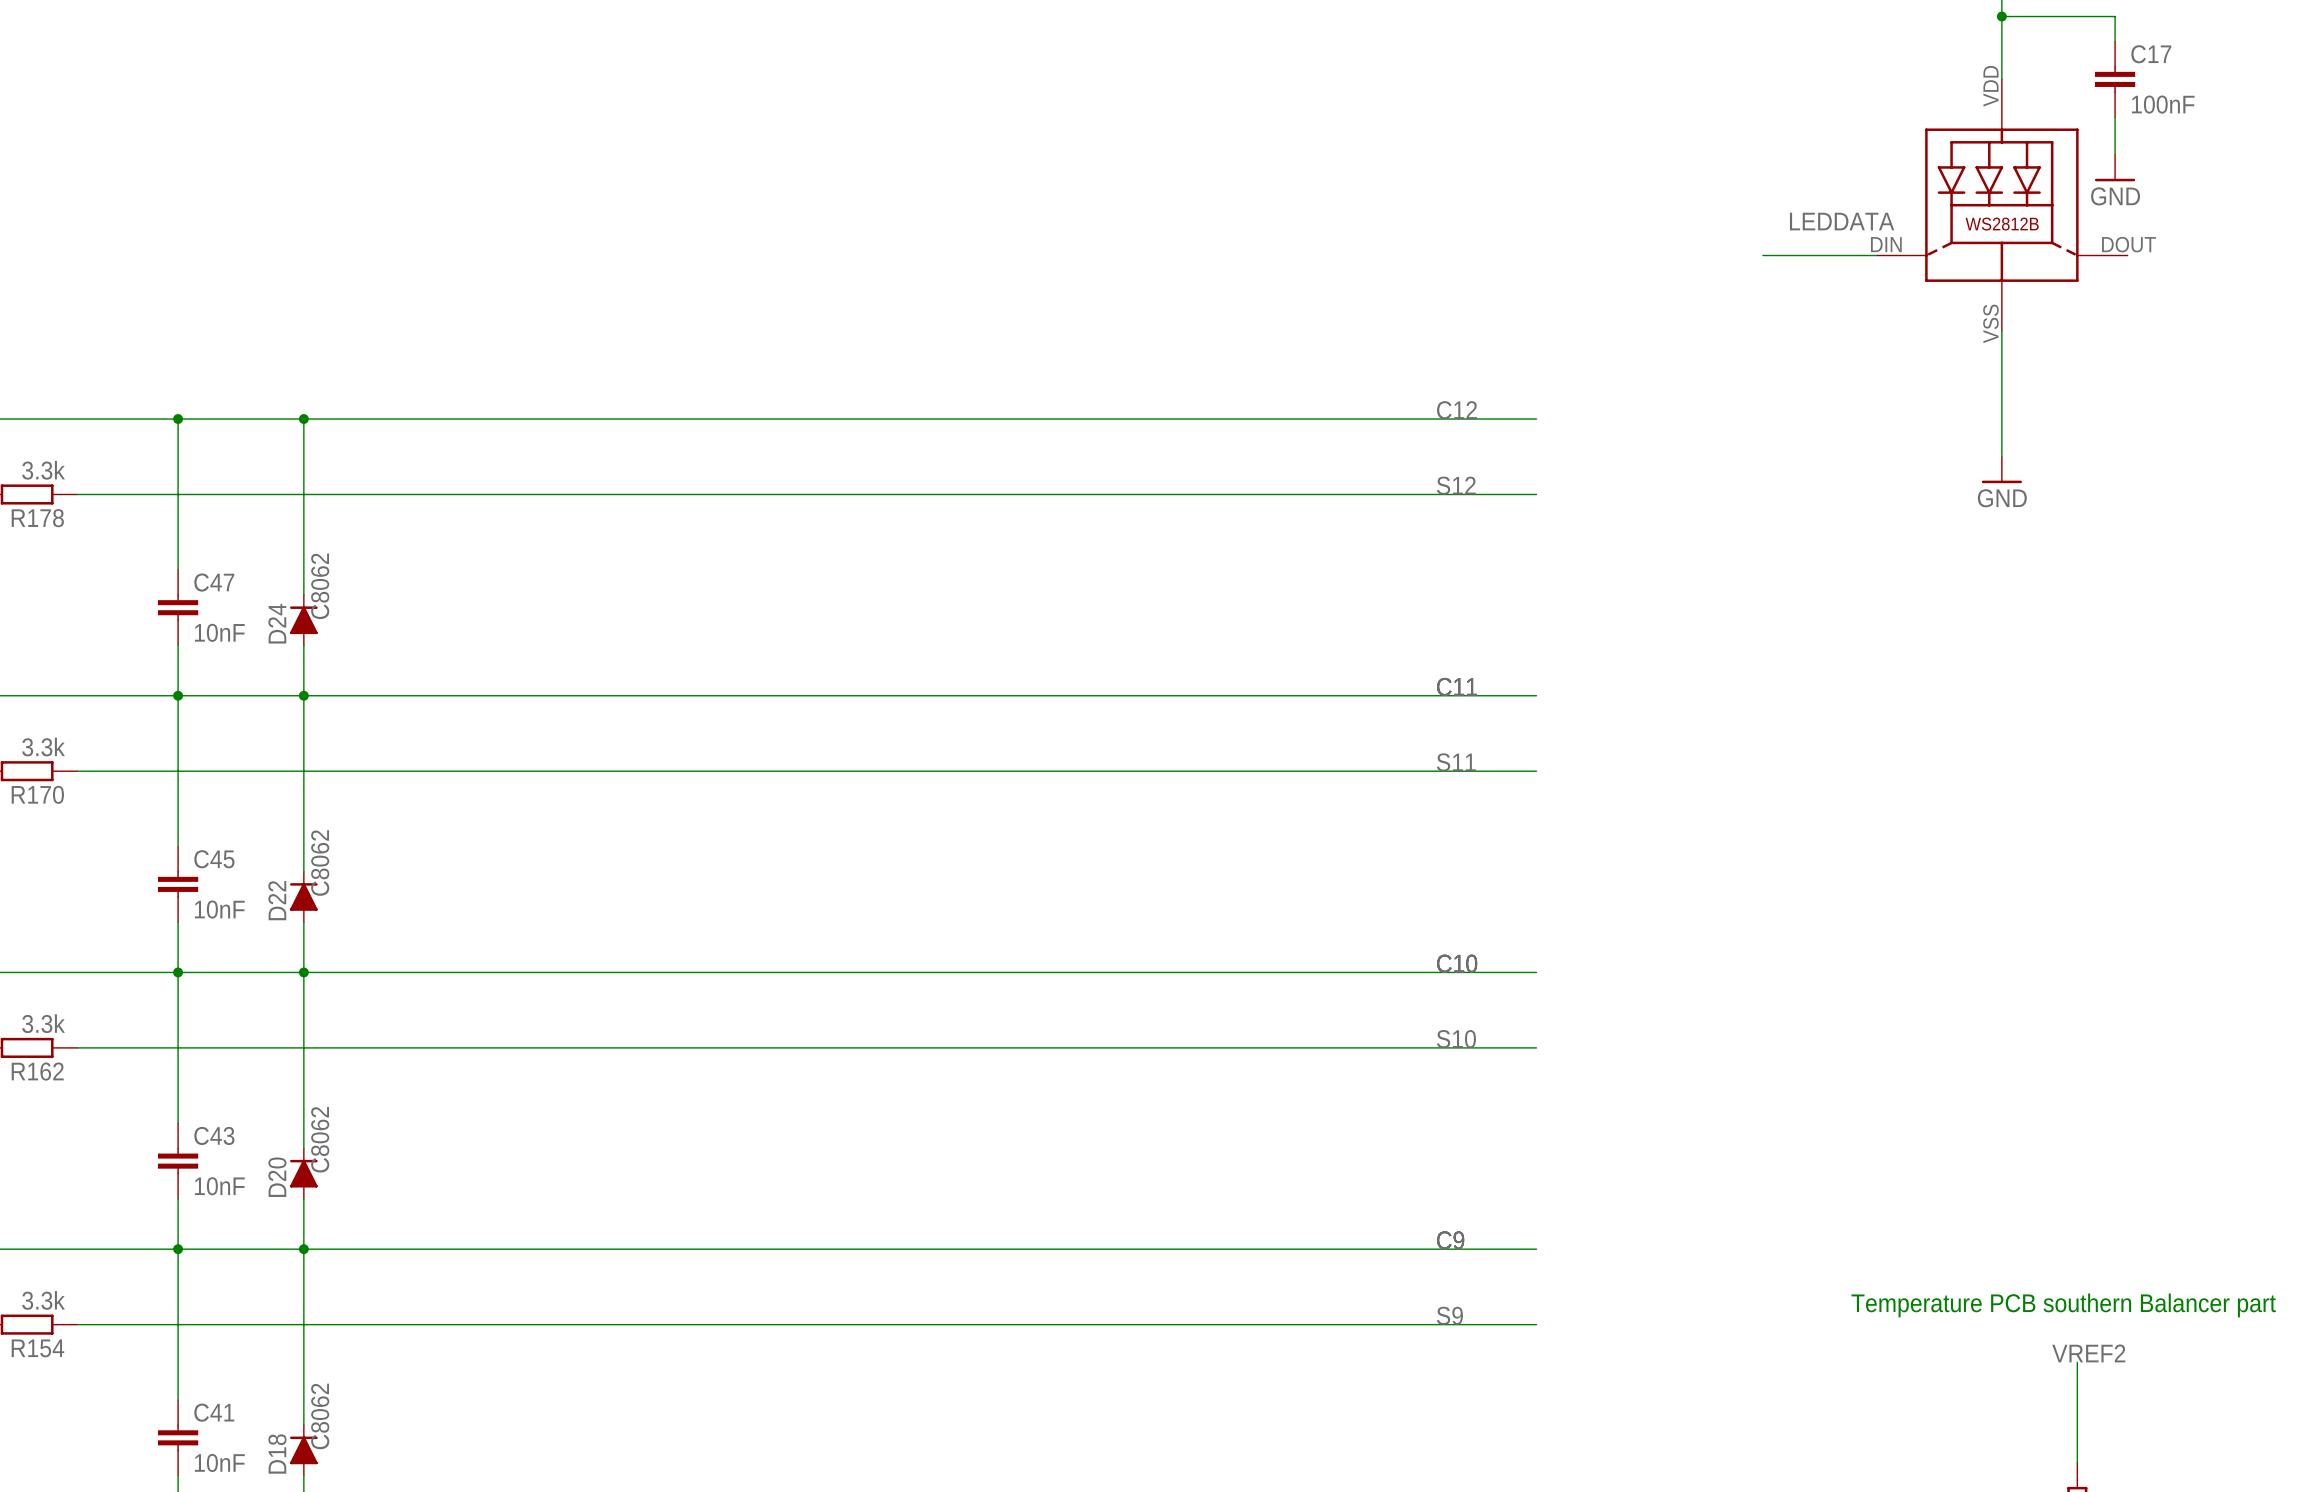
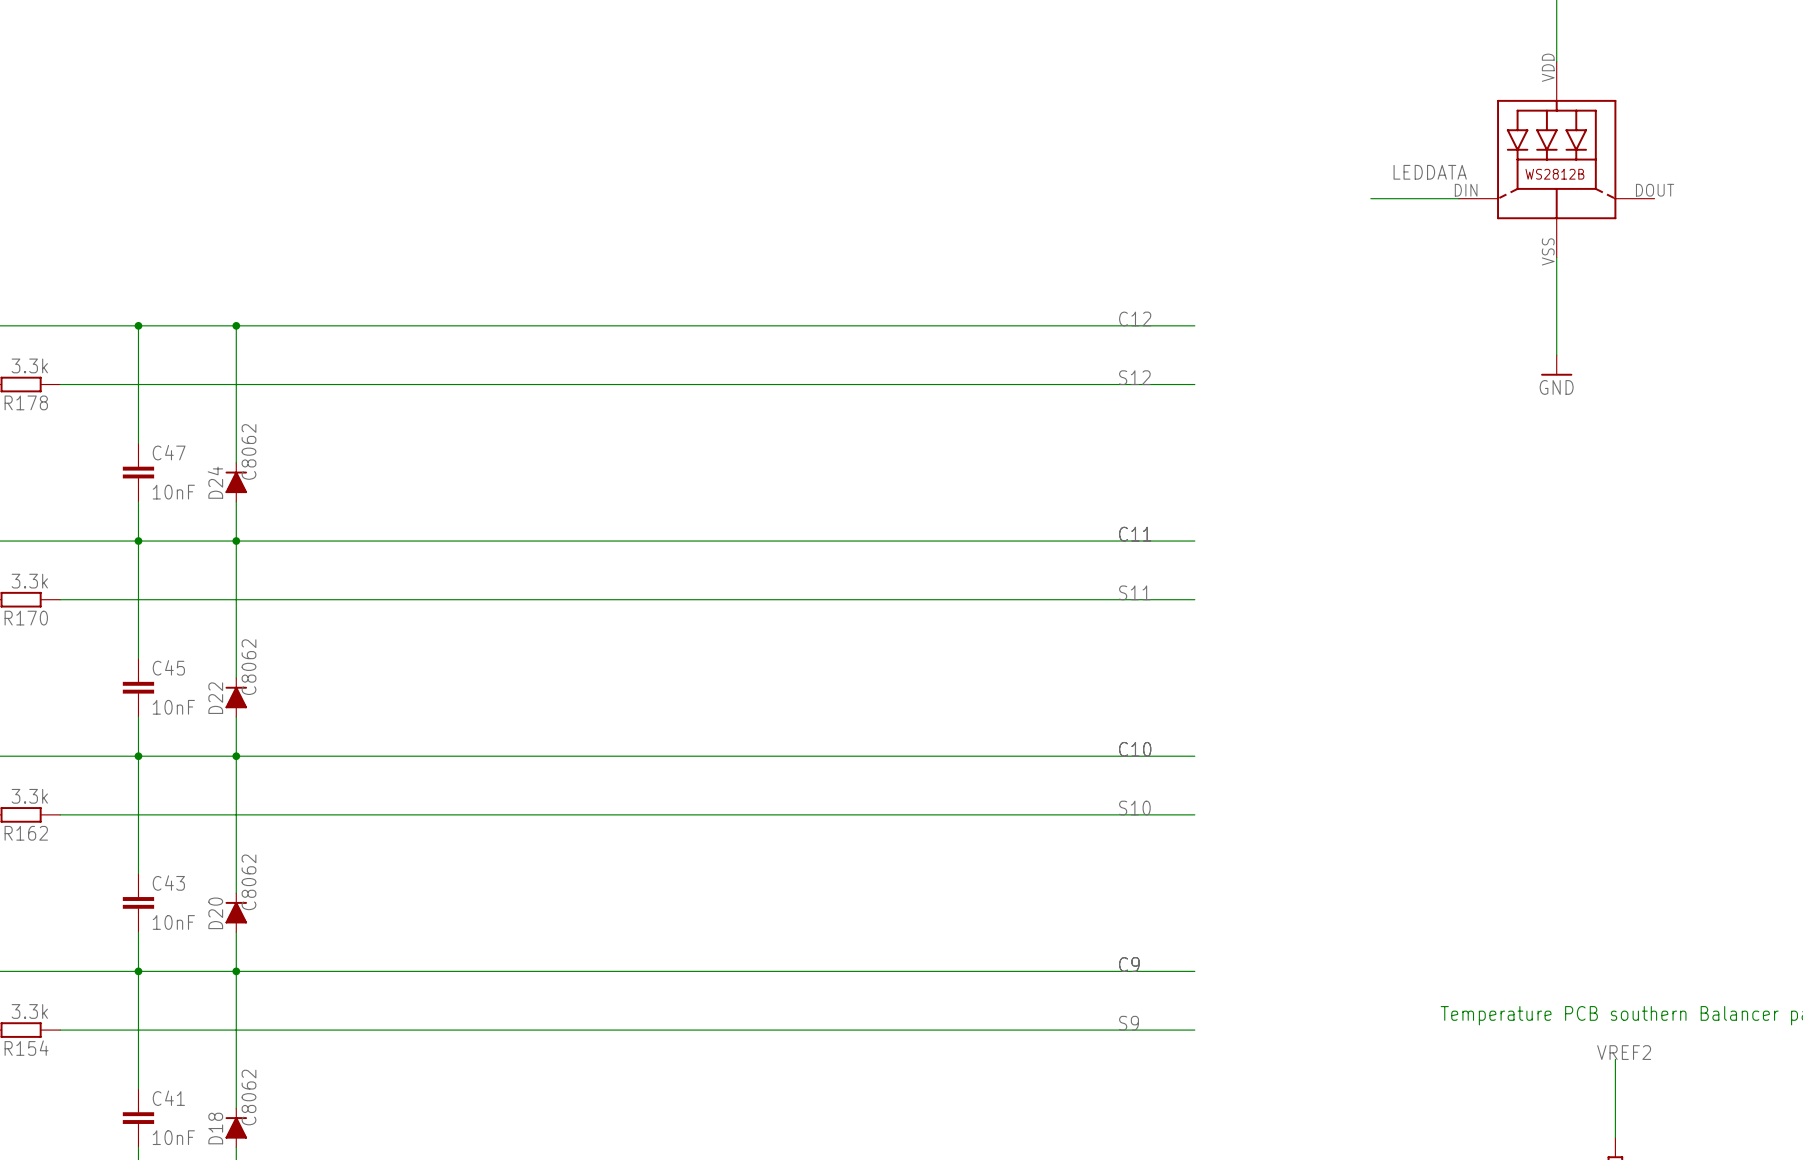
wire: (2001, 16) (2115, 16) (2115, 41) -> none
junction: (2001, 16) -> none
C17: 100nF (2115, 79) -> none
wire: (2115, 117) (2115, 154) -> none
power symbol: GND (2115, 168) -> none

